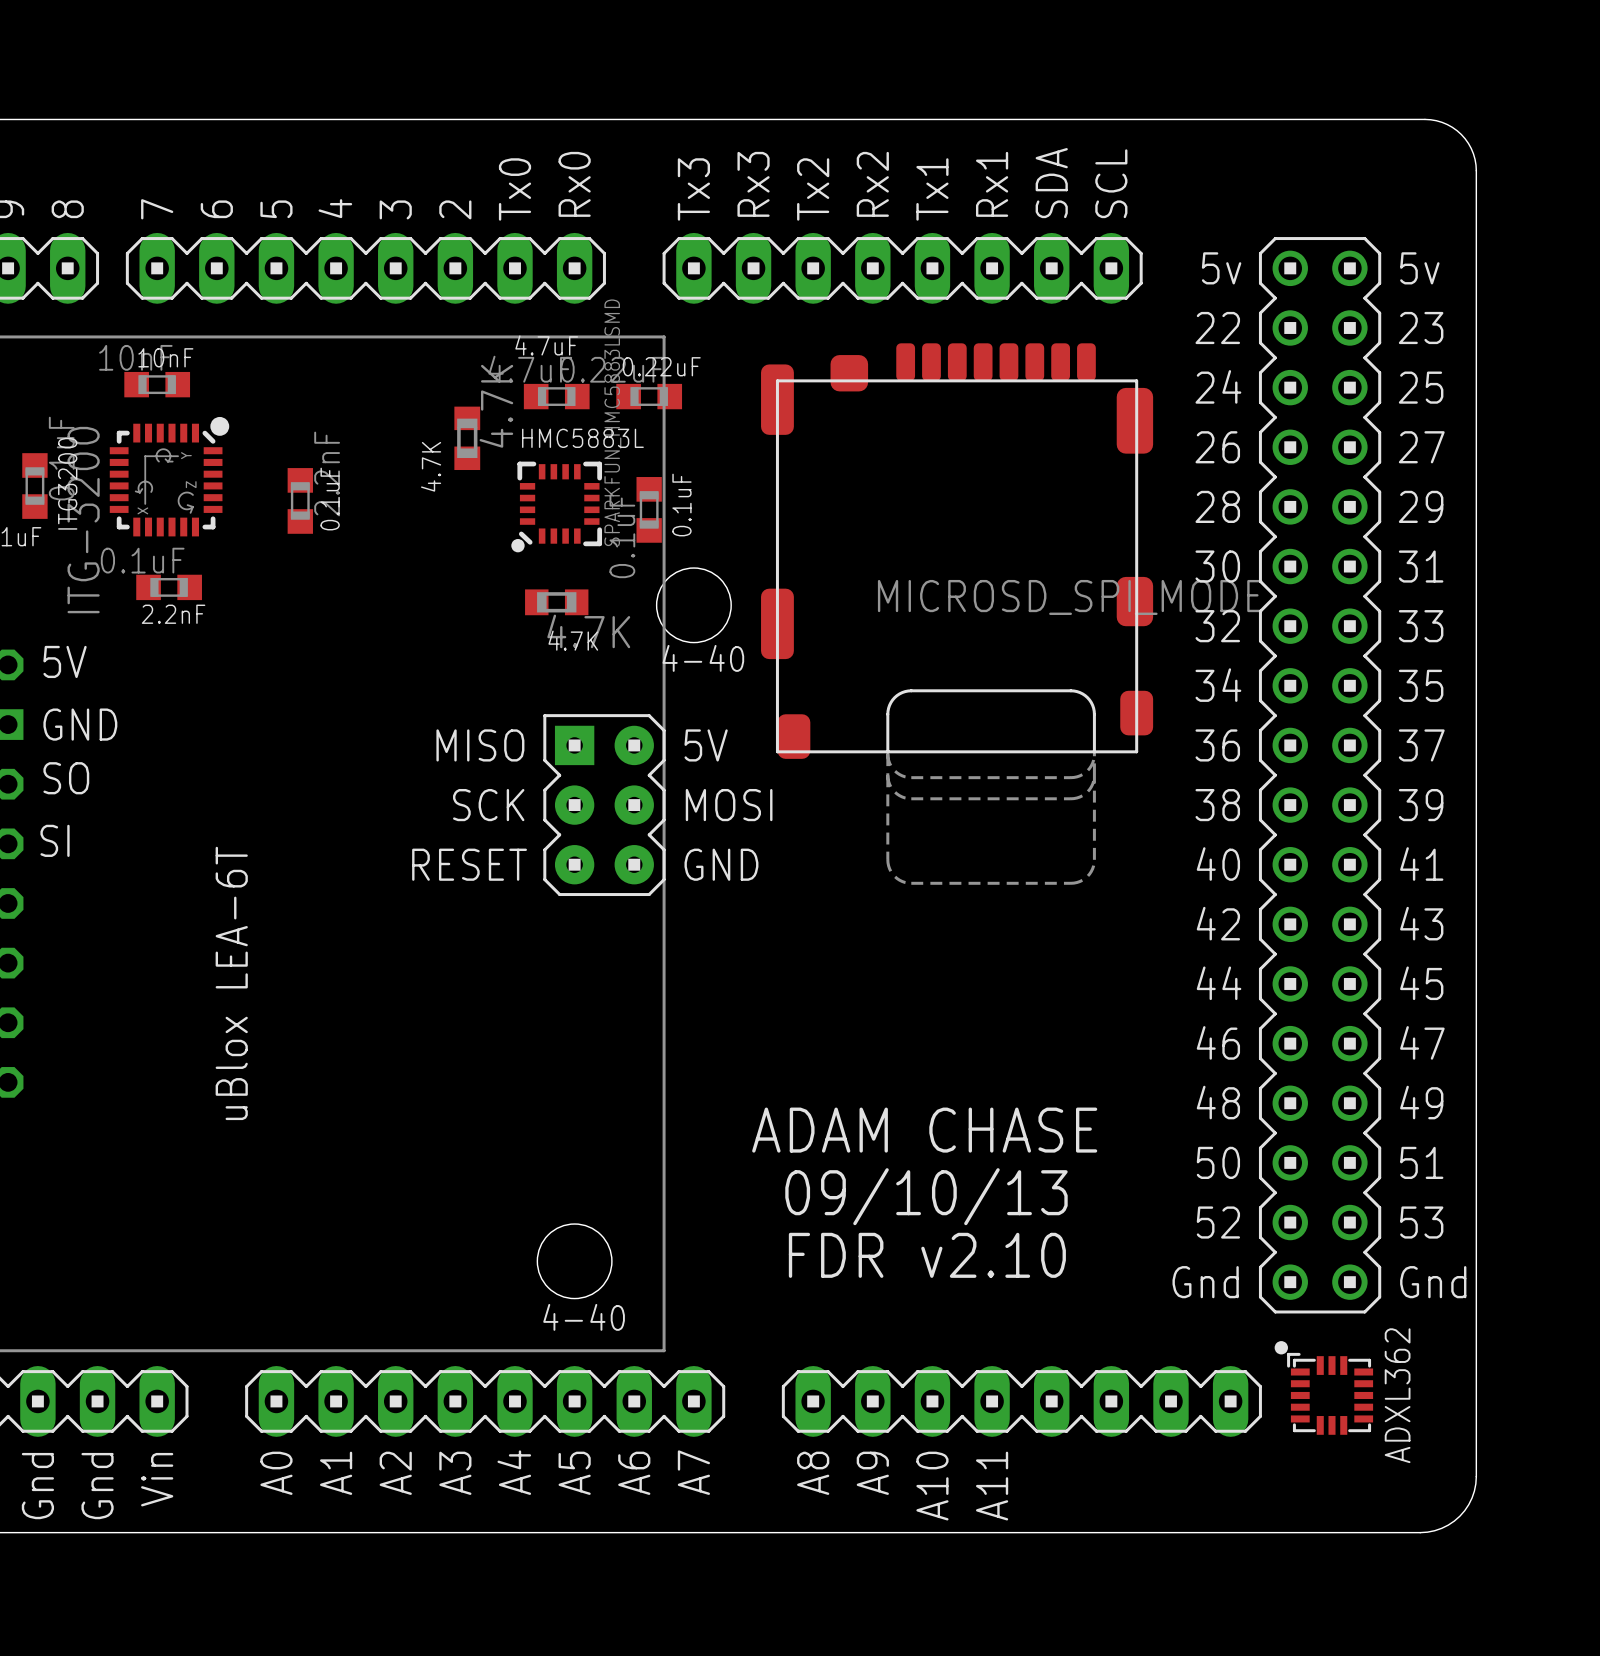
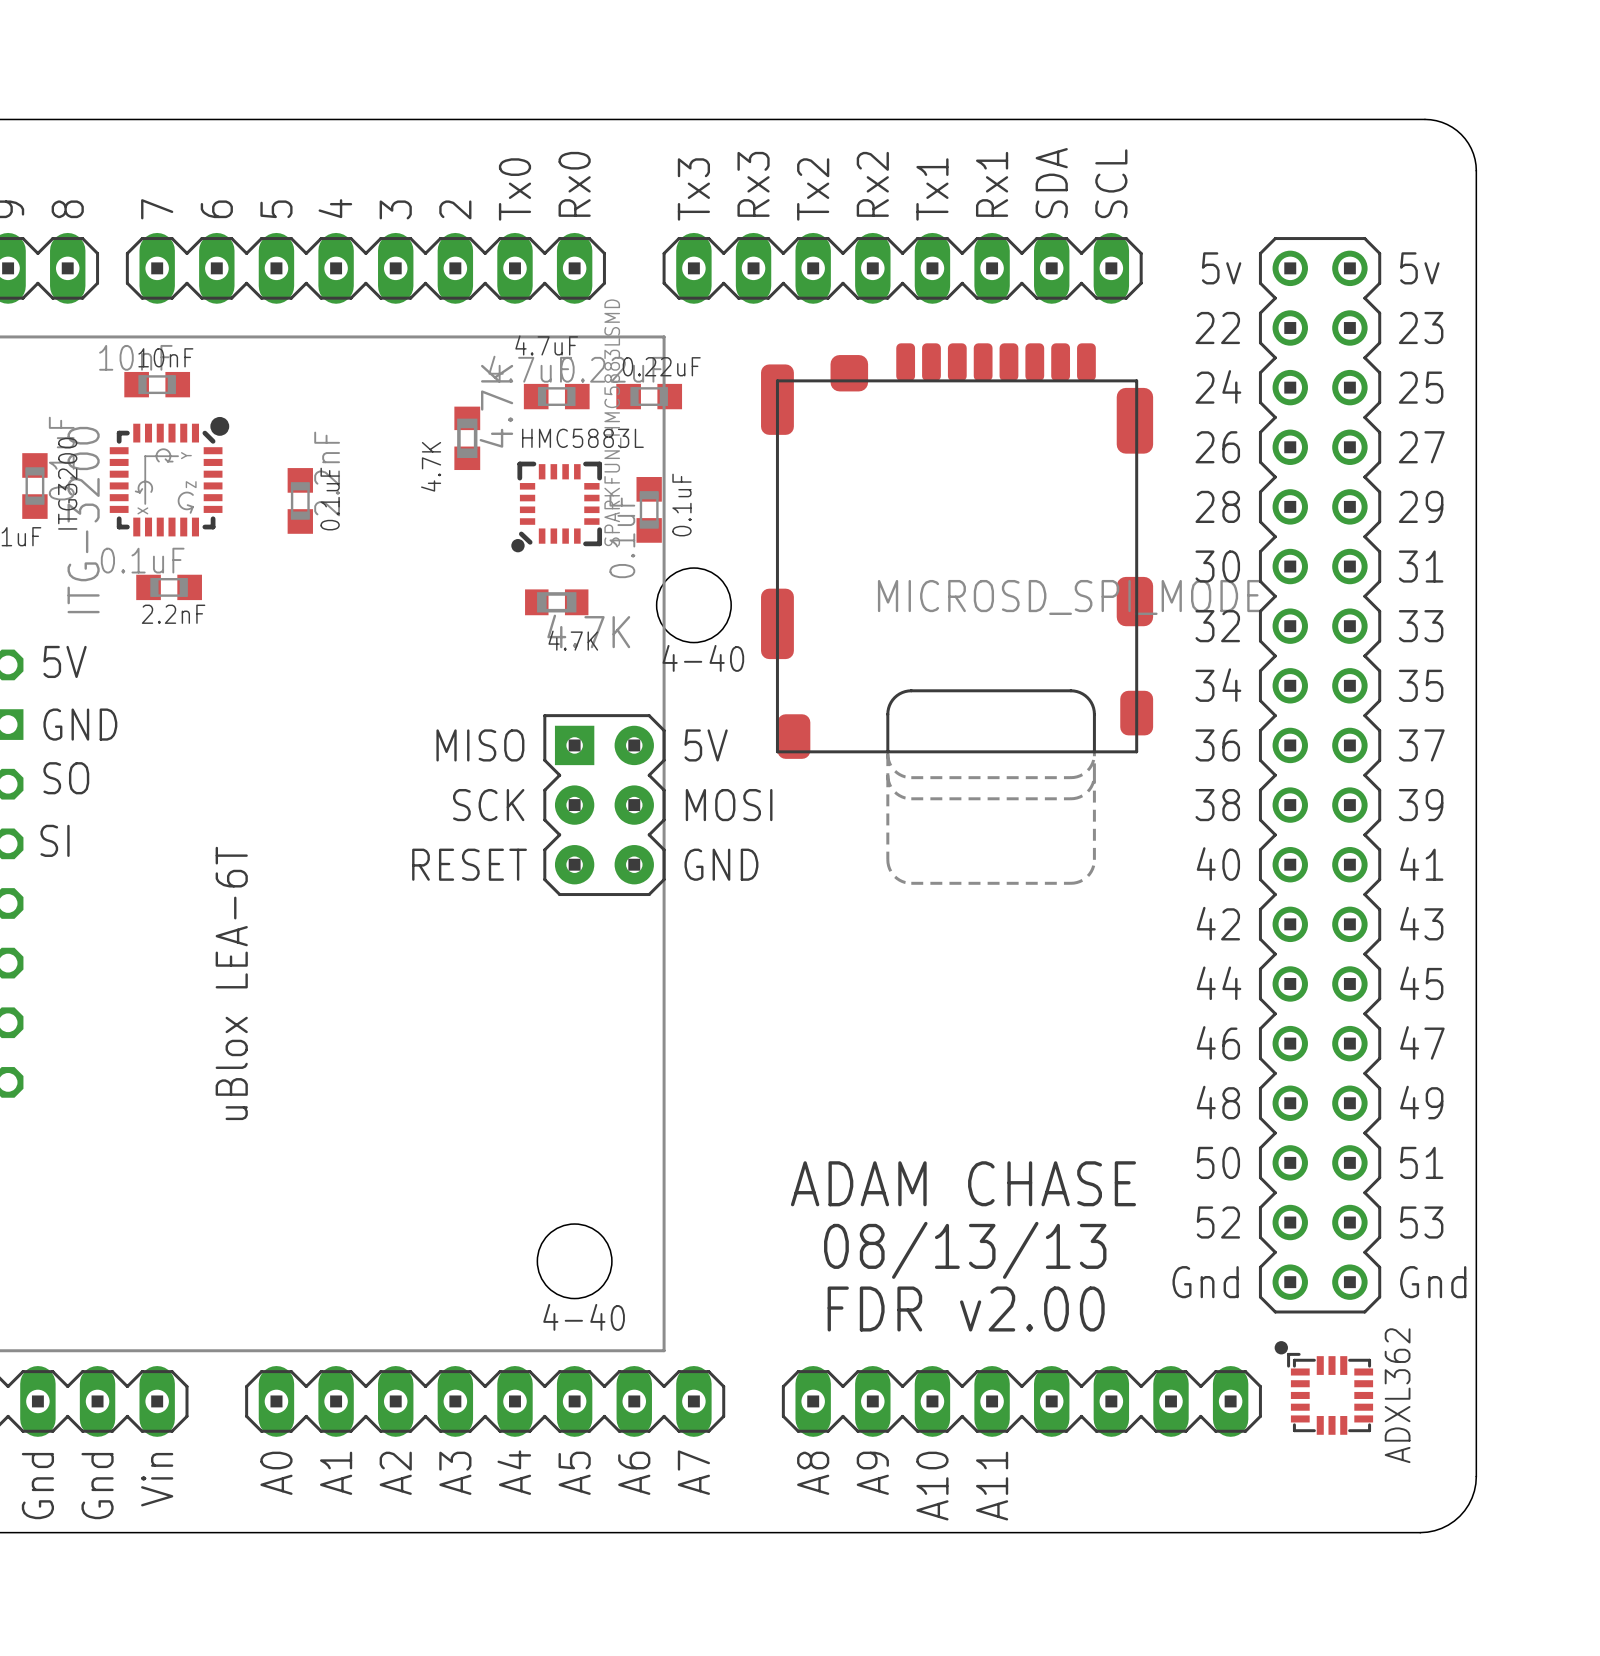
text position: ADAM CHASE (924, 1130) -> ADAM CHASE (963, 1183)
text: 09/10/13 (926, 1196) -> none
text: none -> 08/13/13 (965, 1250)
text: FDR v2.10 (927, 1255) -> FDR v2.00 (966, 1309)

